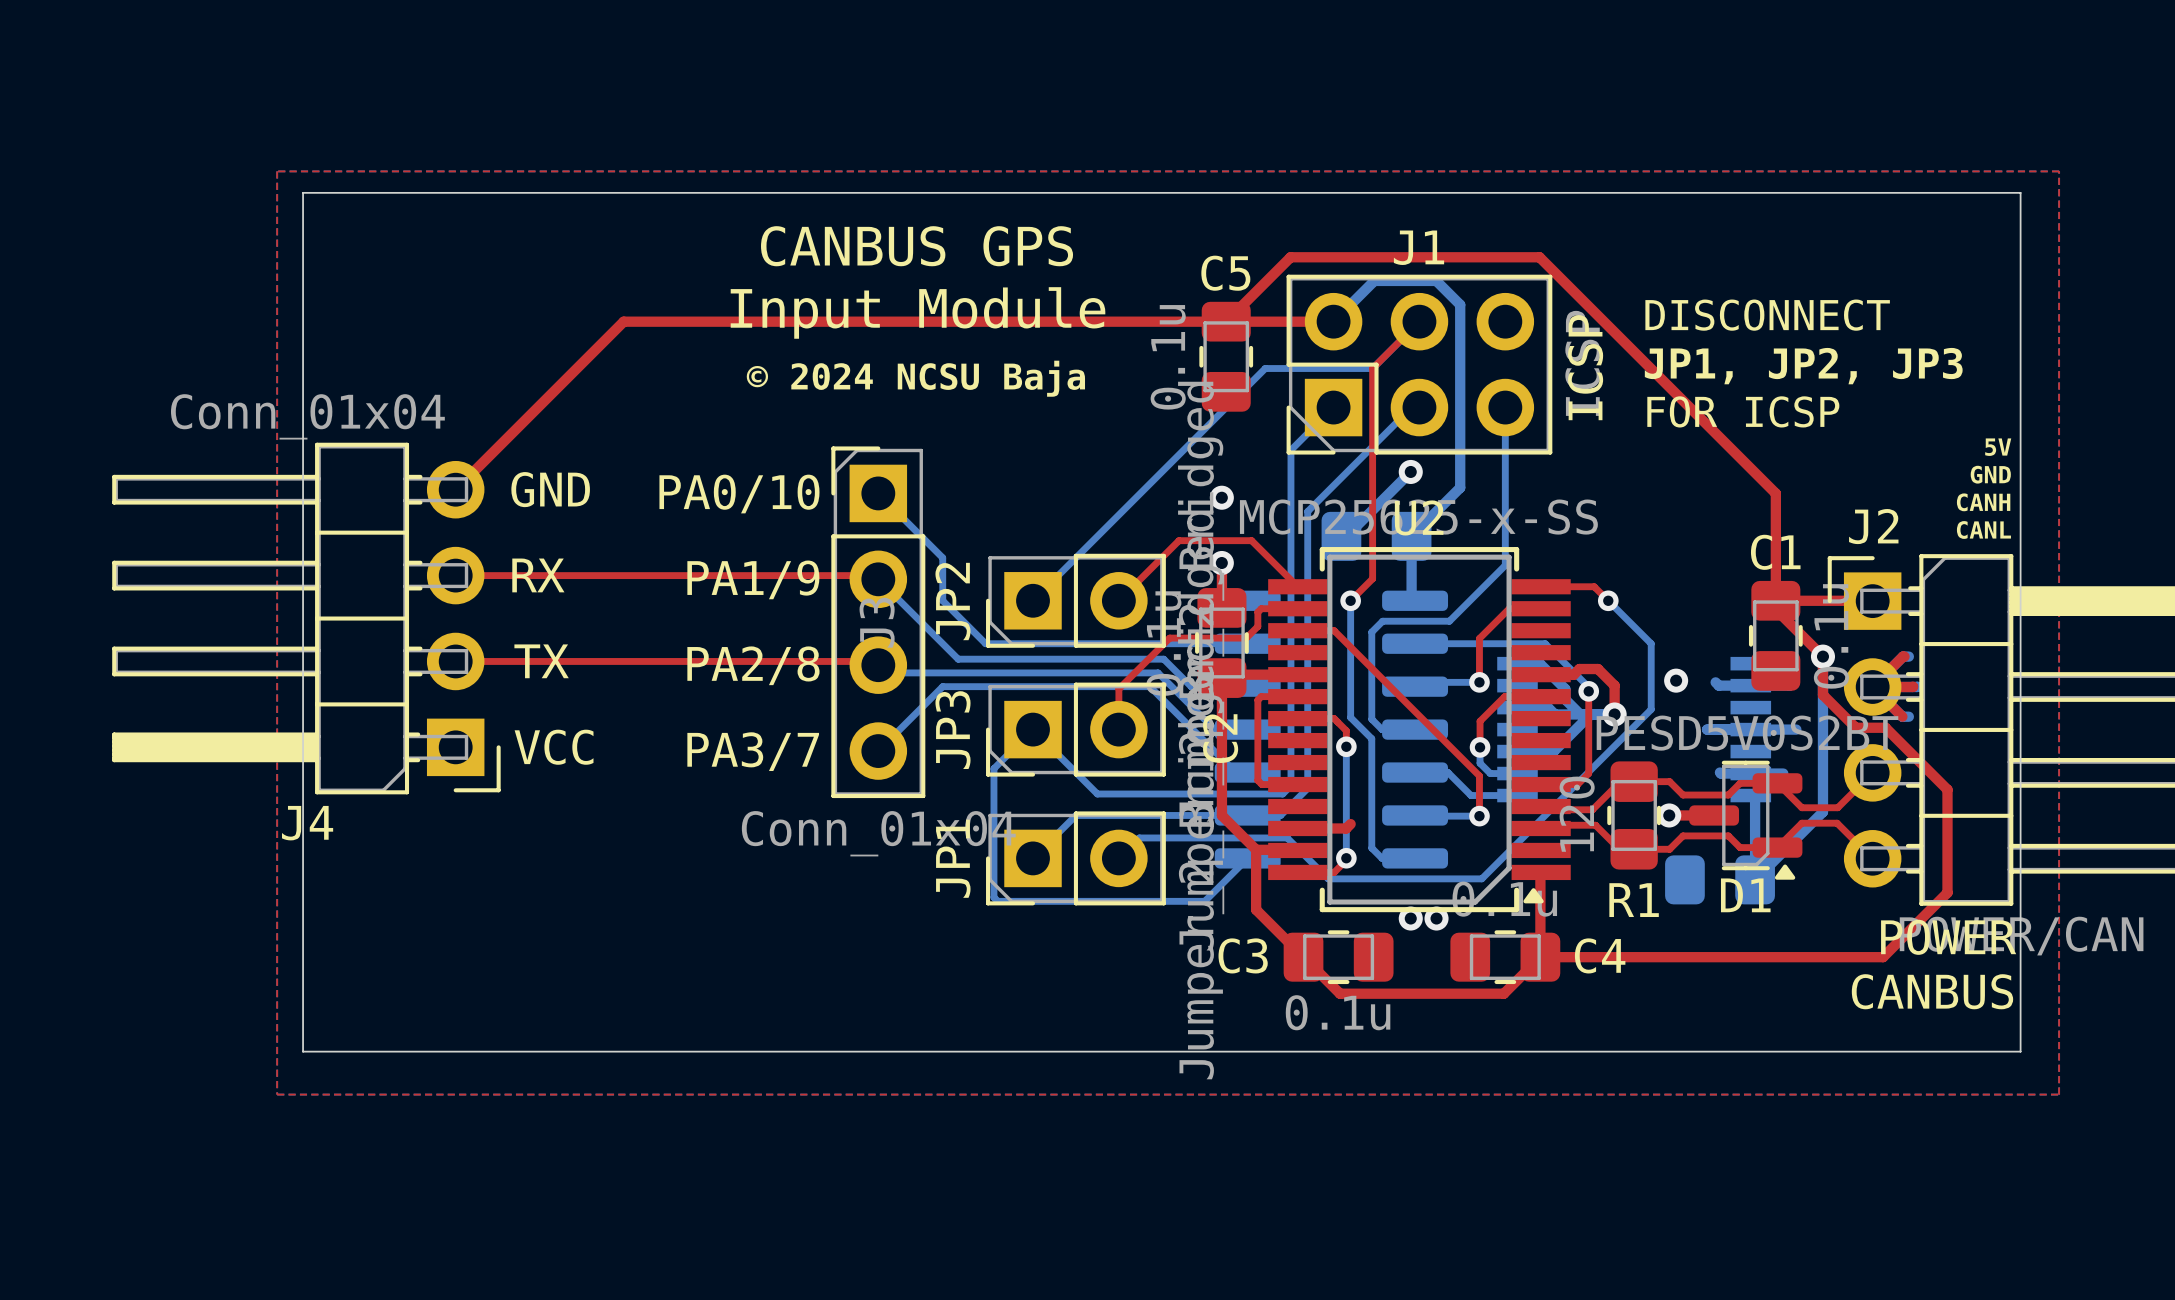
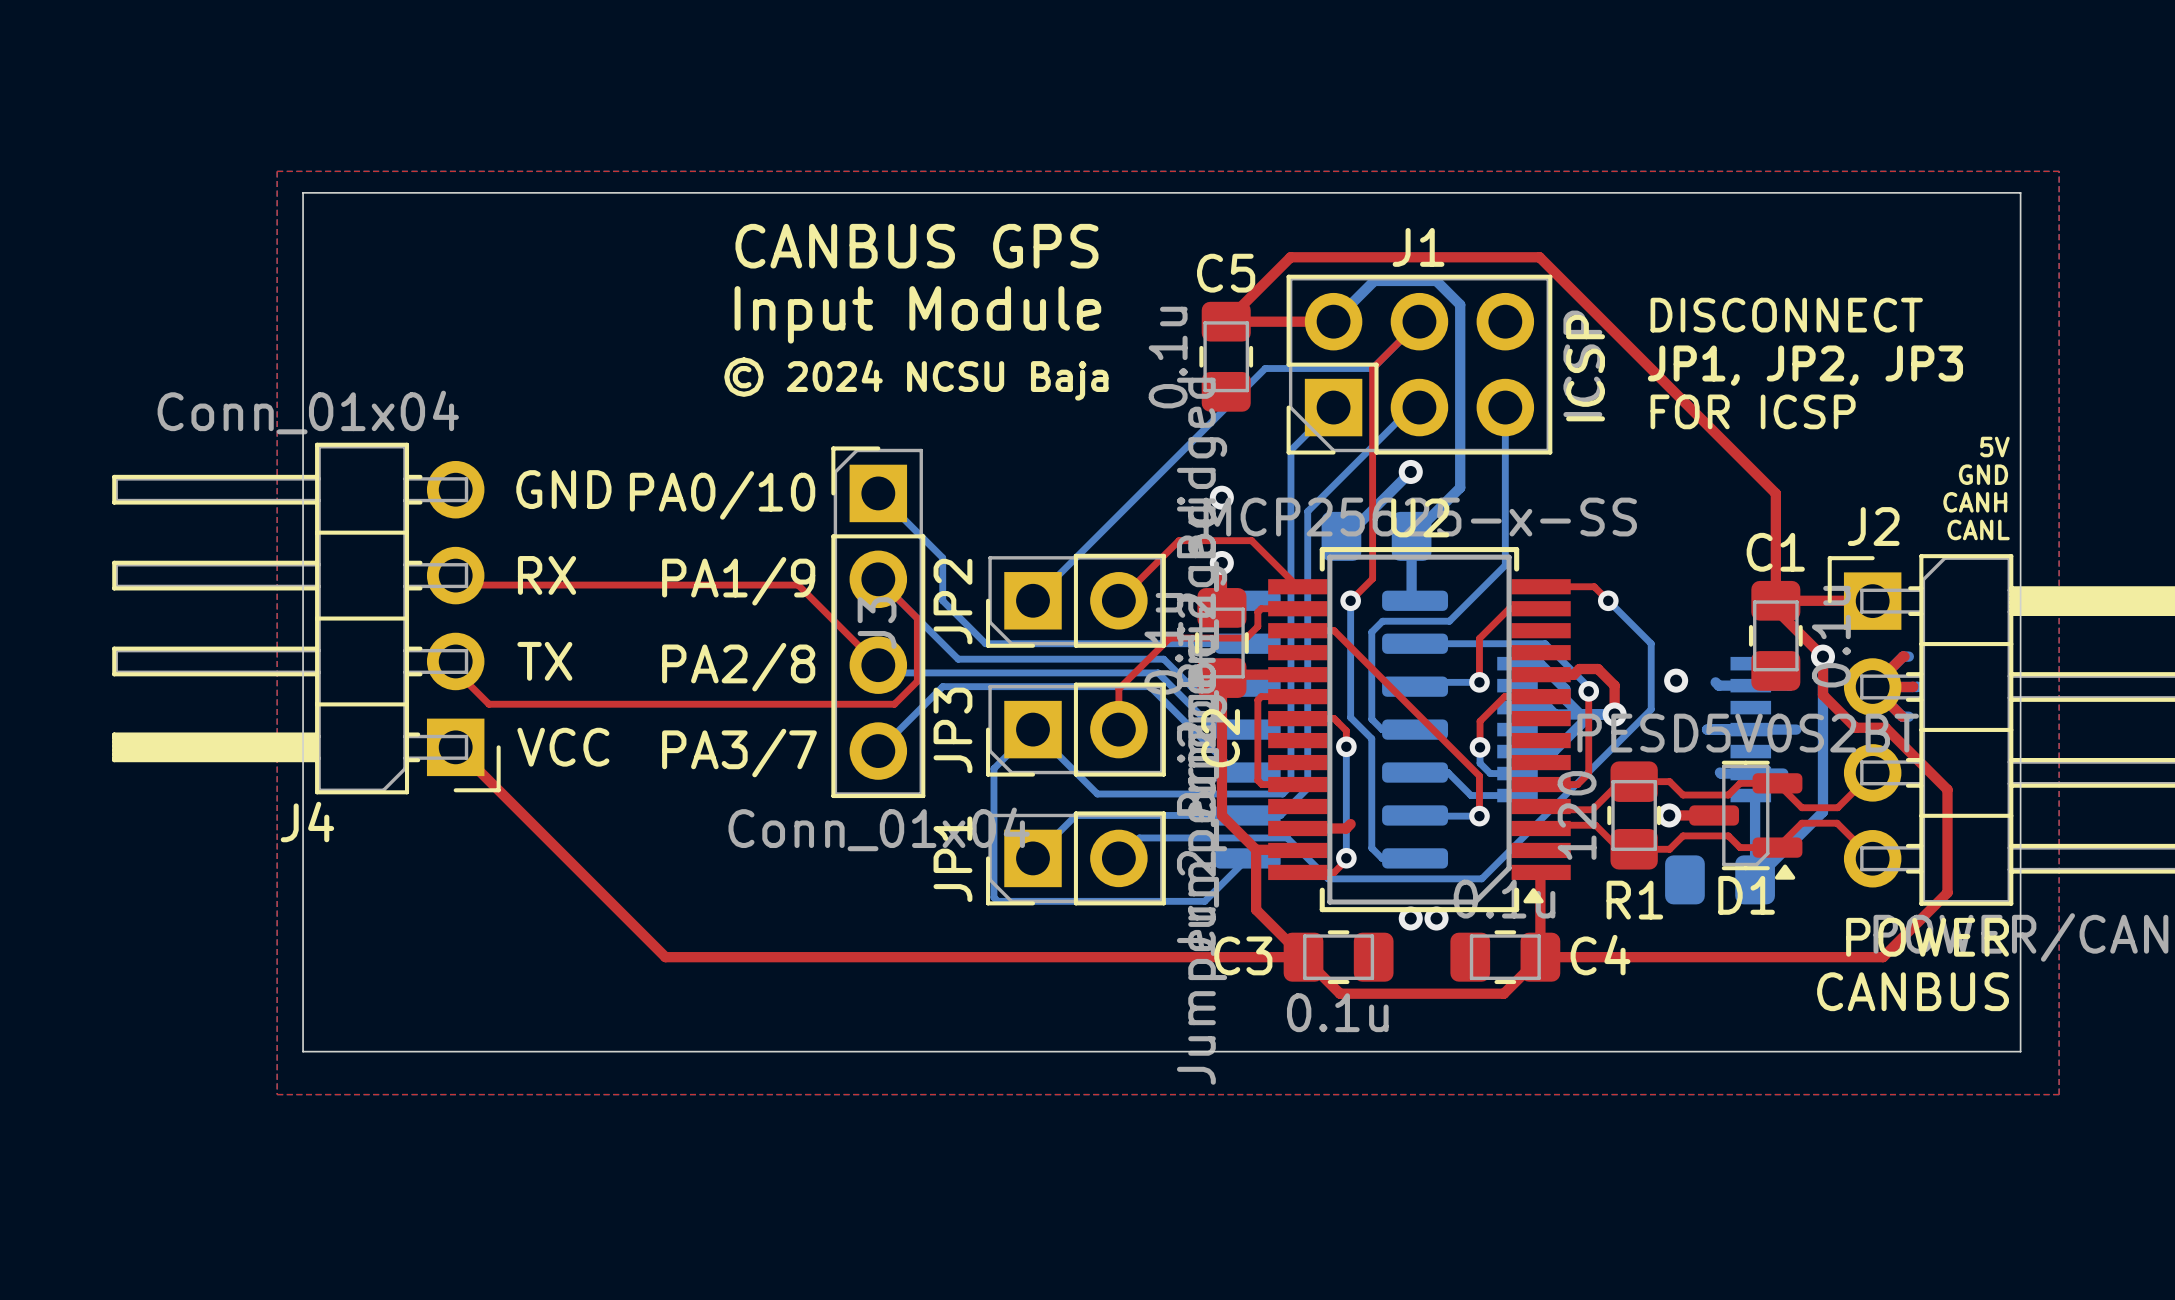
top track: (1226, 321) (623, 321) (455, 489) (440, 489) -> none
top track: (455, 575) (874, 575) (878, 579) -> (455, 670) (489, 704) (894, 704) (917, 681) (917, 618) (878, 579)
top track: (455, 661) (874, 661) -> (455, 585) (798, 585) (874, 661)
top track: none -> (455, 747) (665, 957) (1303, 957)

